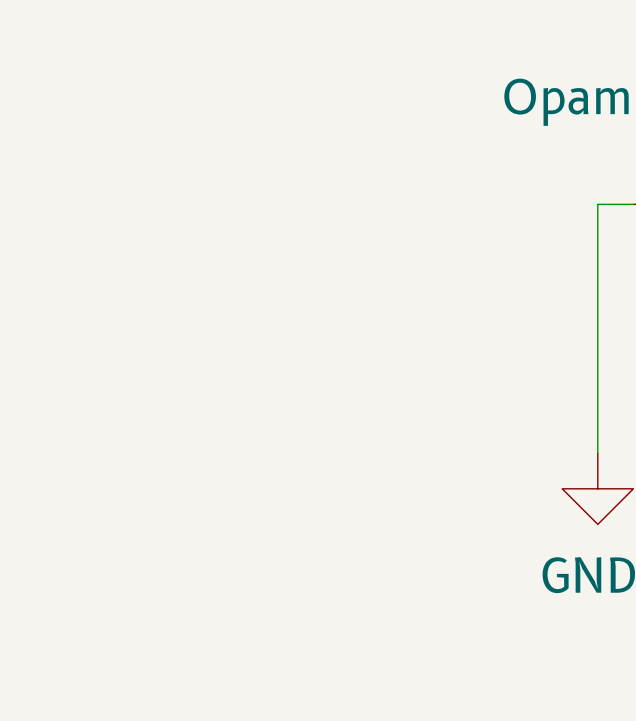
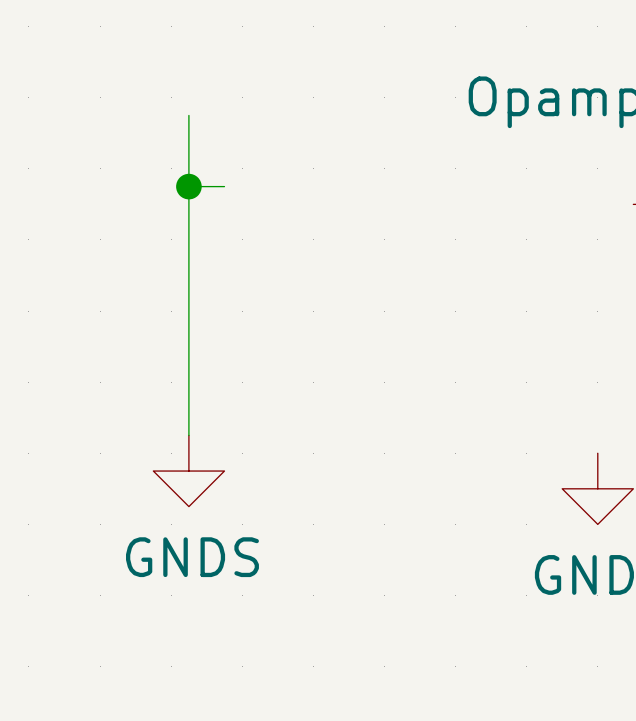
wire: none -> (188, 115) (188, 435)
wire: none -> (188, 186) (224, 186)
junction: none -> (188, 186)
wire: (633, 204) (597, 204) (597, 453) -> none
power symbol: none -> GNDS (188, 471)

